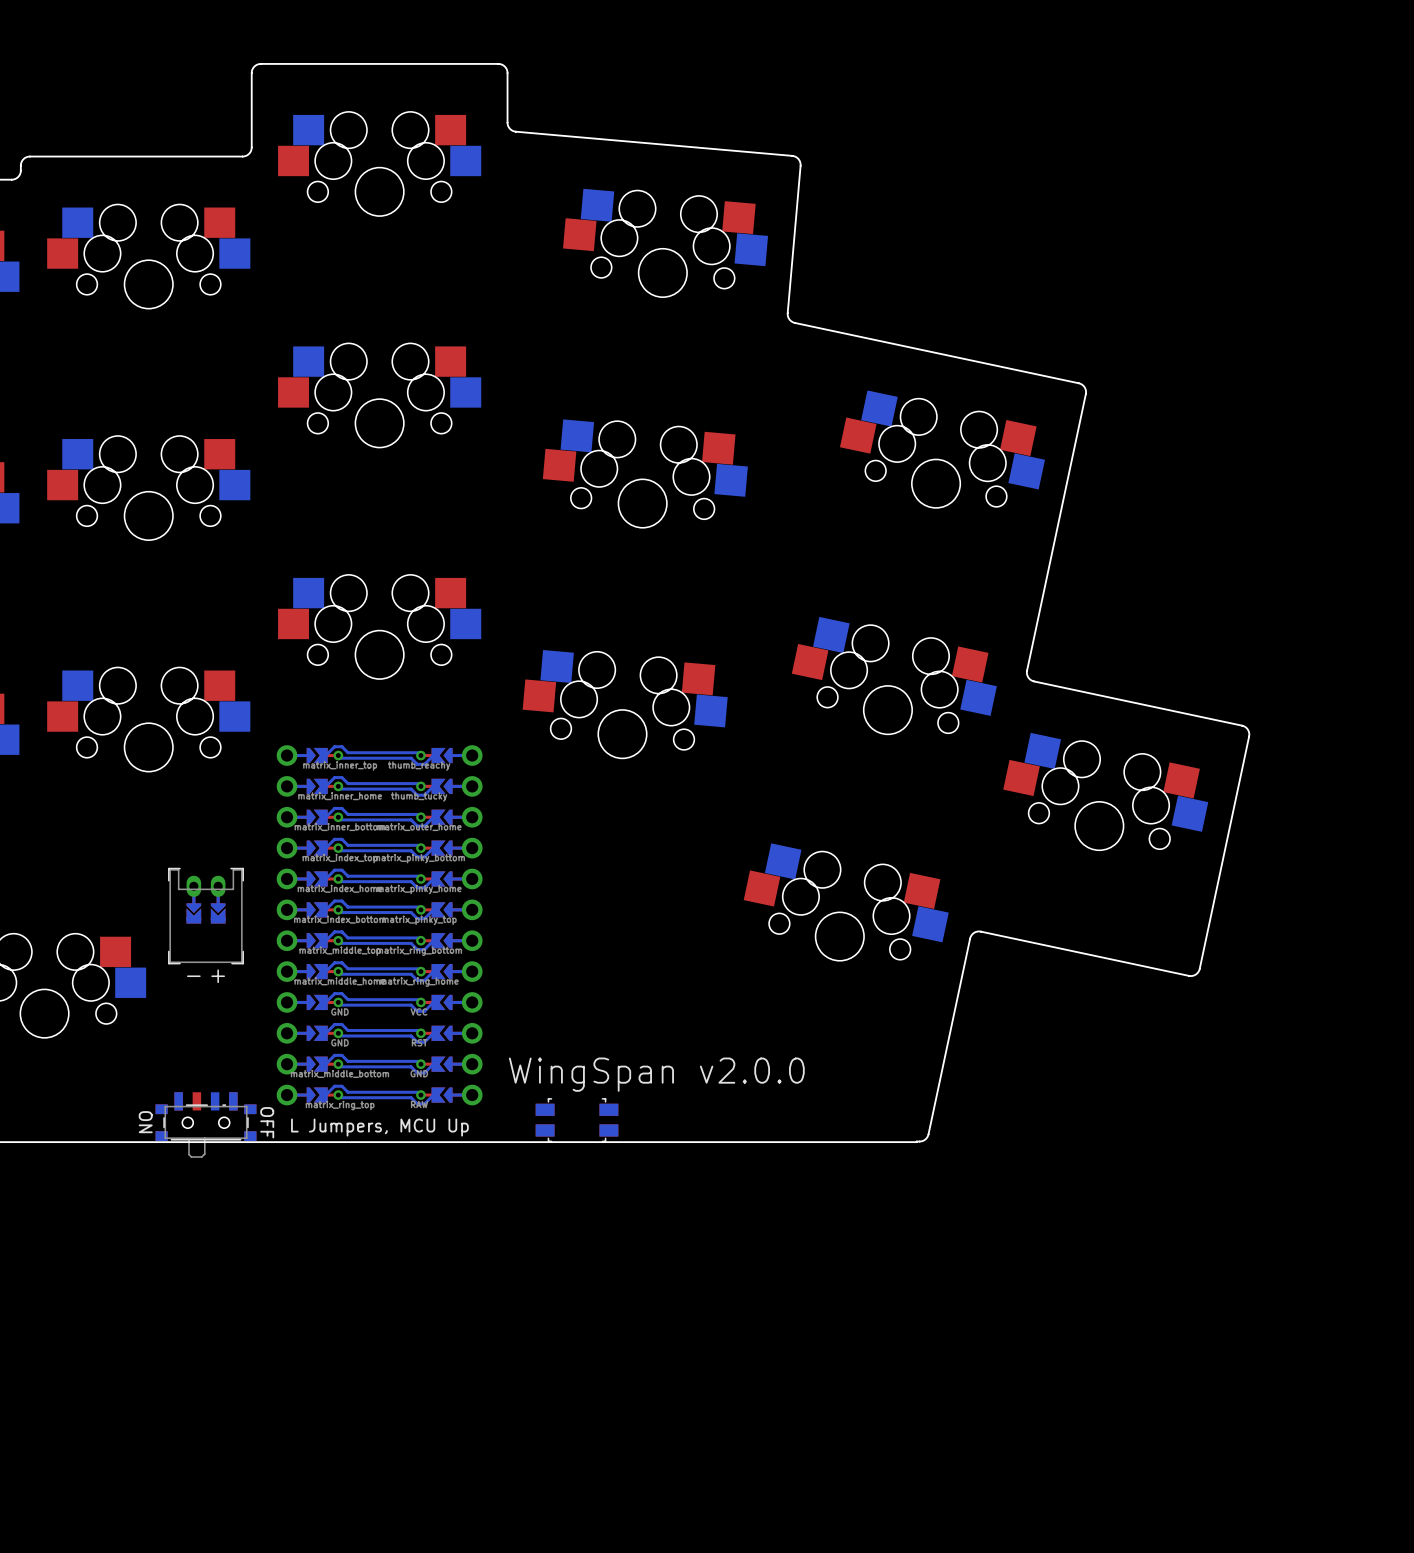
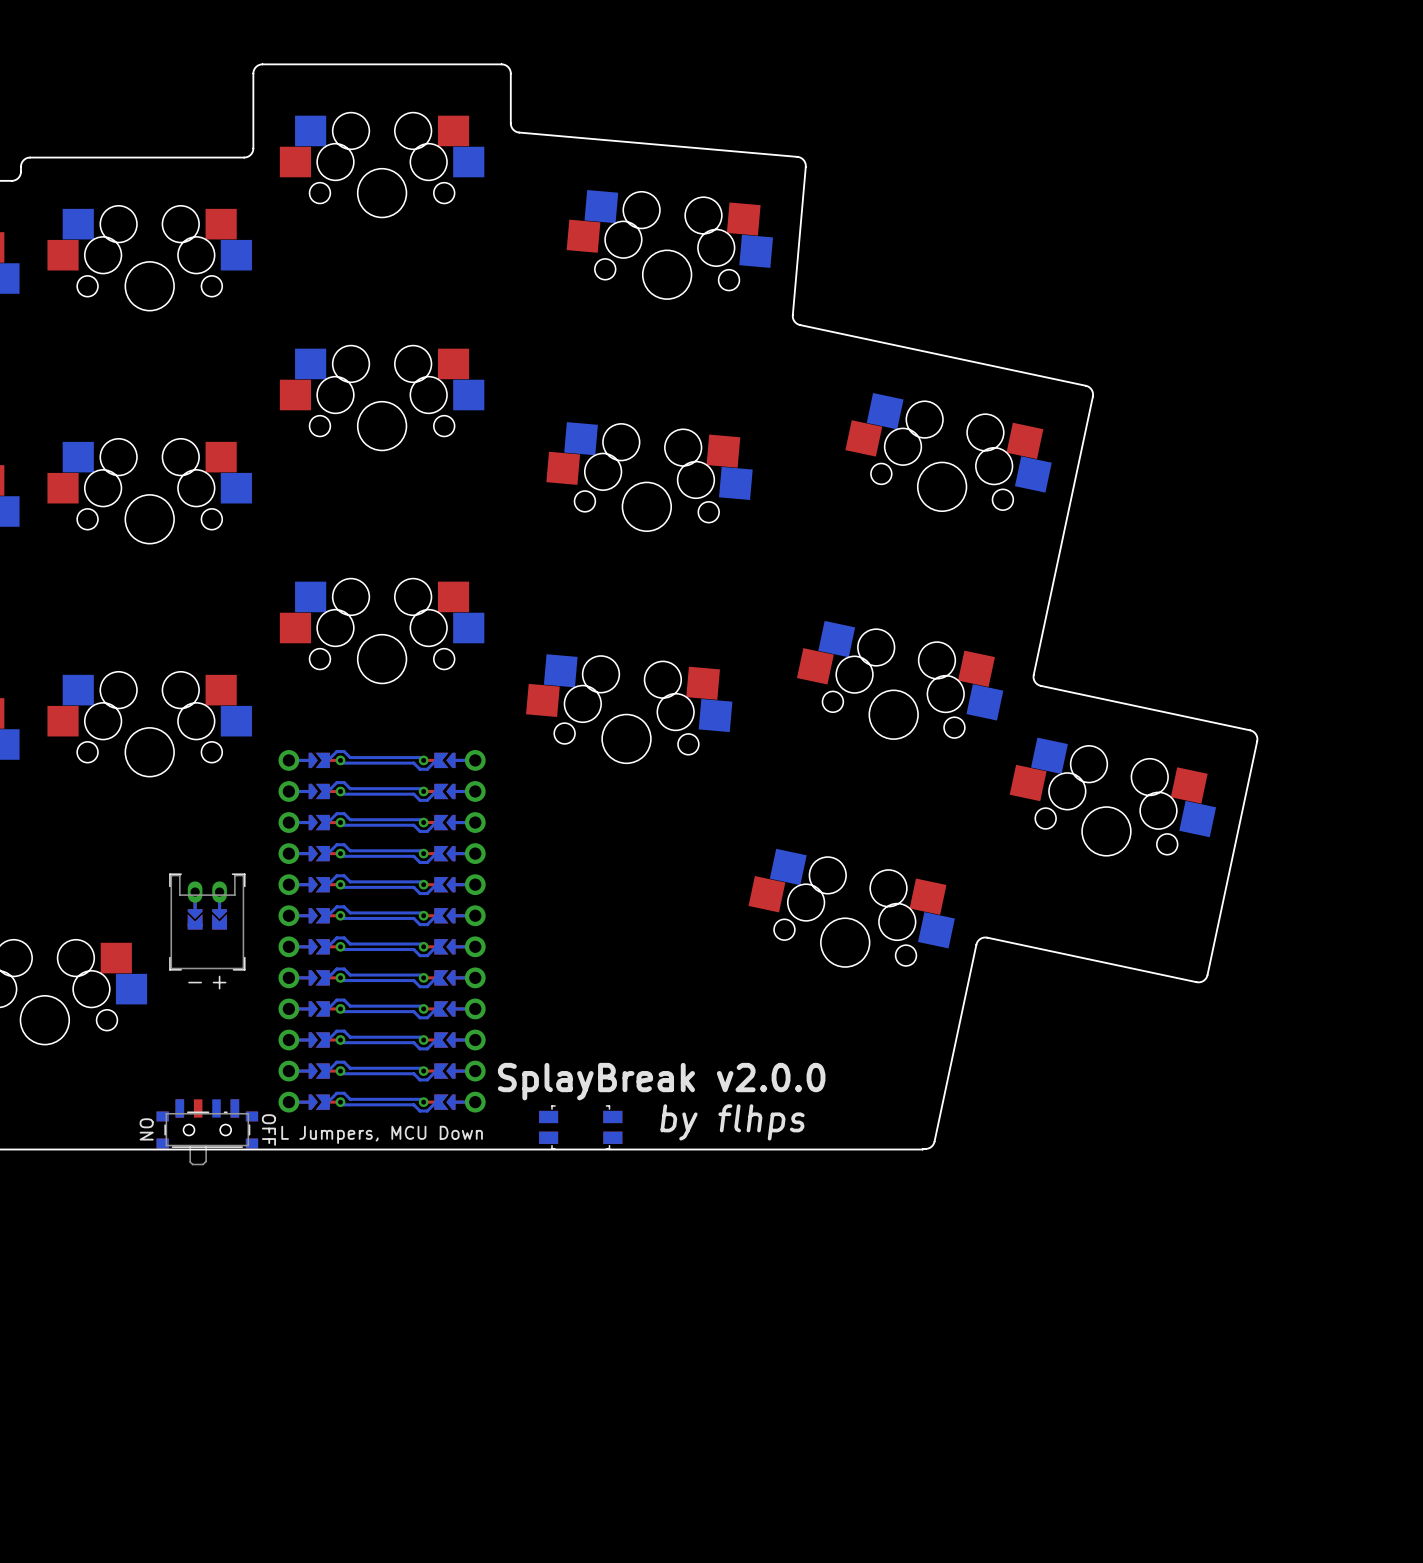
part footprint: [276, 745, 483, 1106] -> [278, 750, 486, 1113]
text: WingSpan v2.0.0 (656, 1074) -> SplayBreak v2.0.0 (661, 1081)
text: none -> by flhps (732, 1122)

